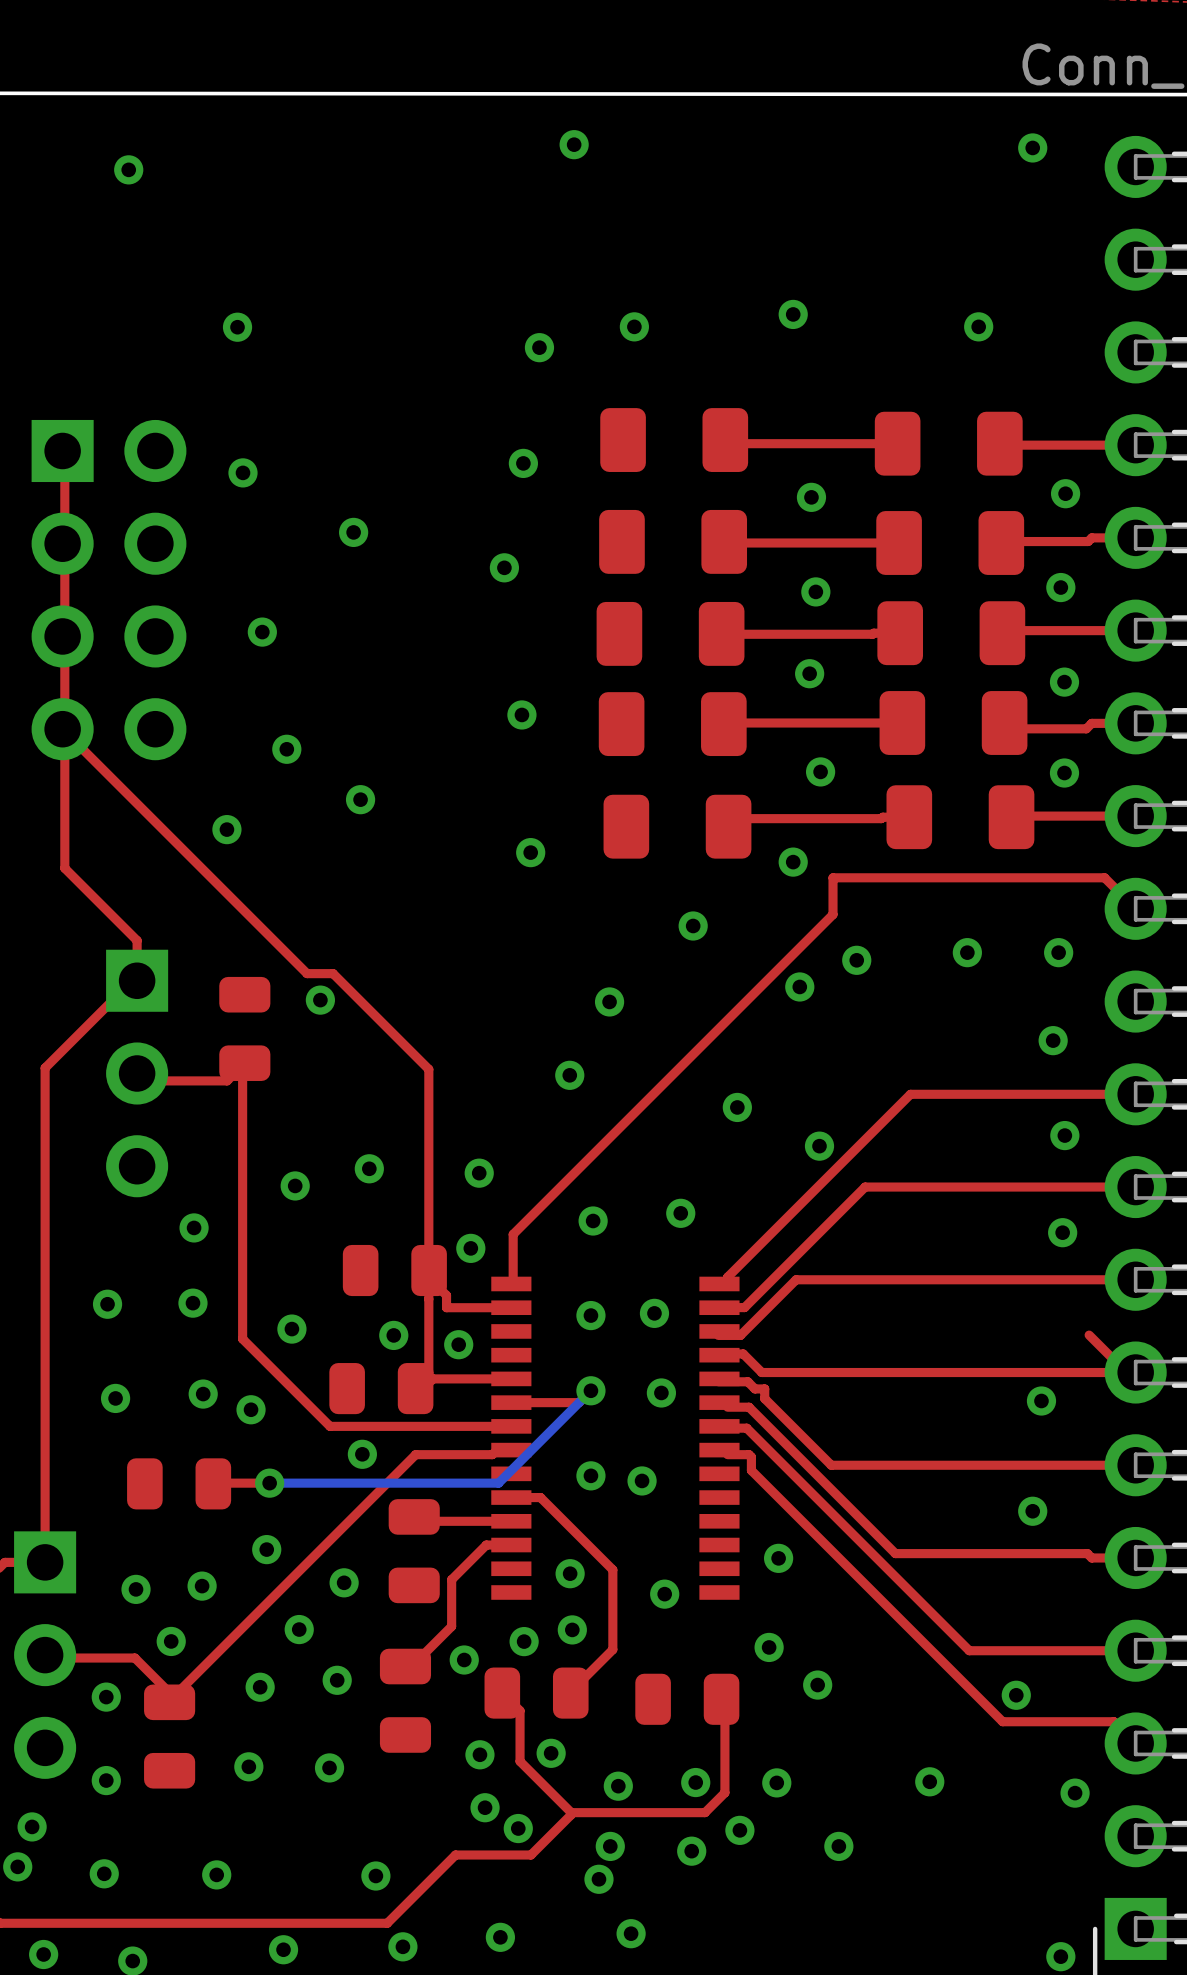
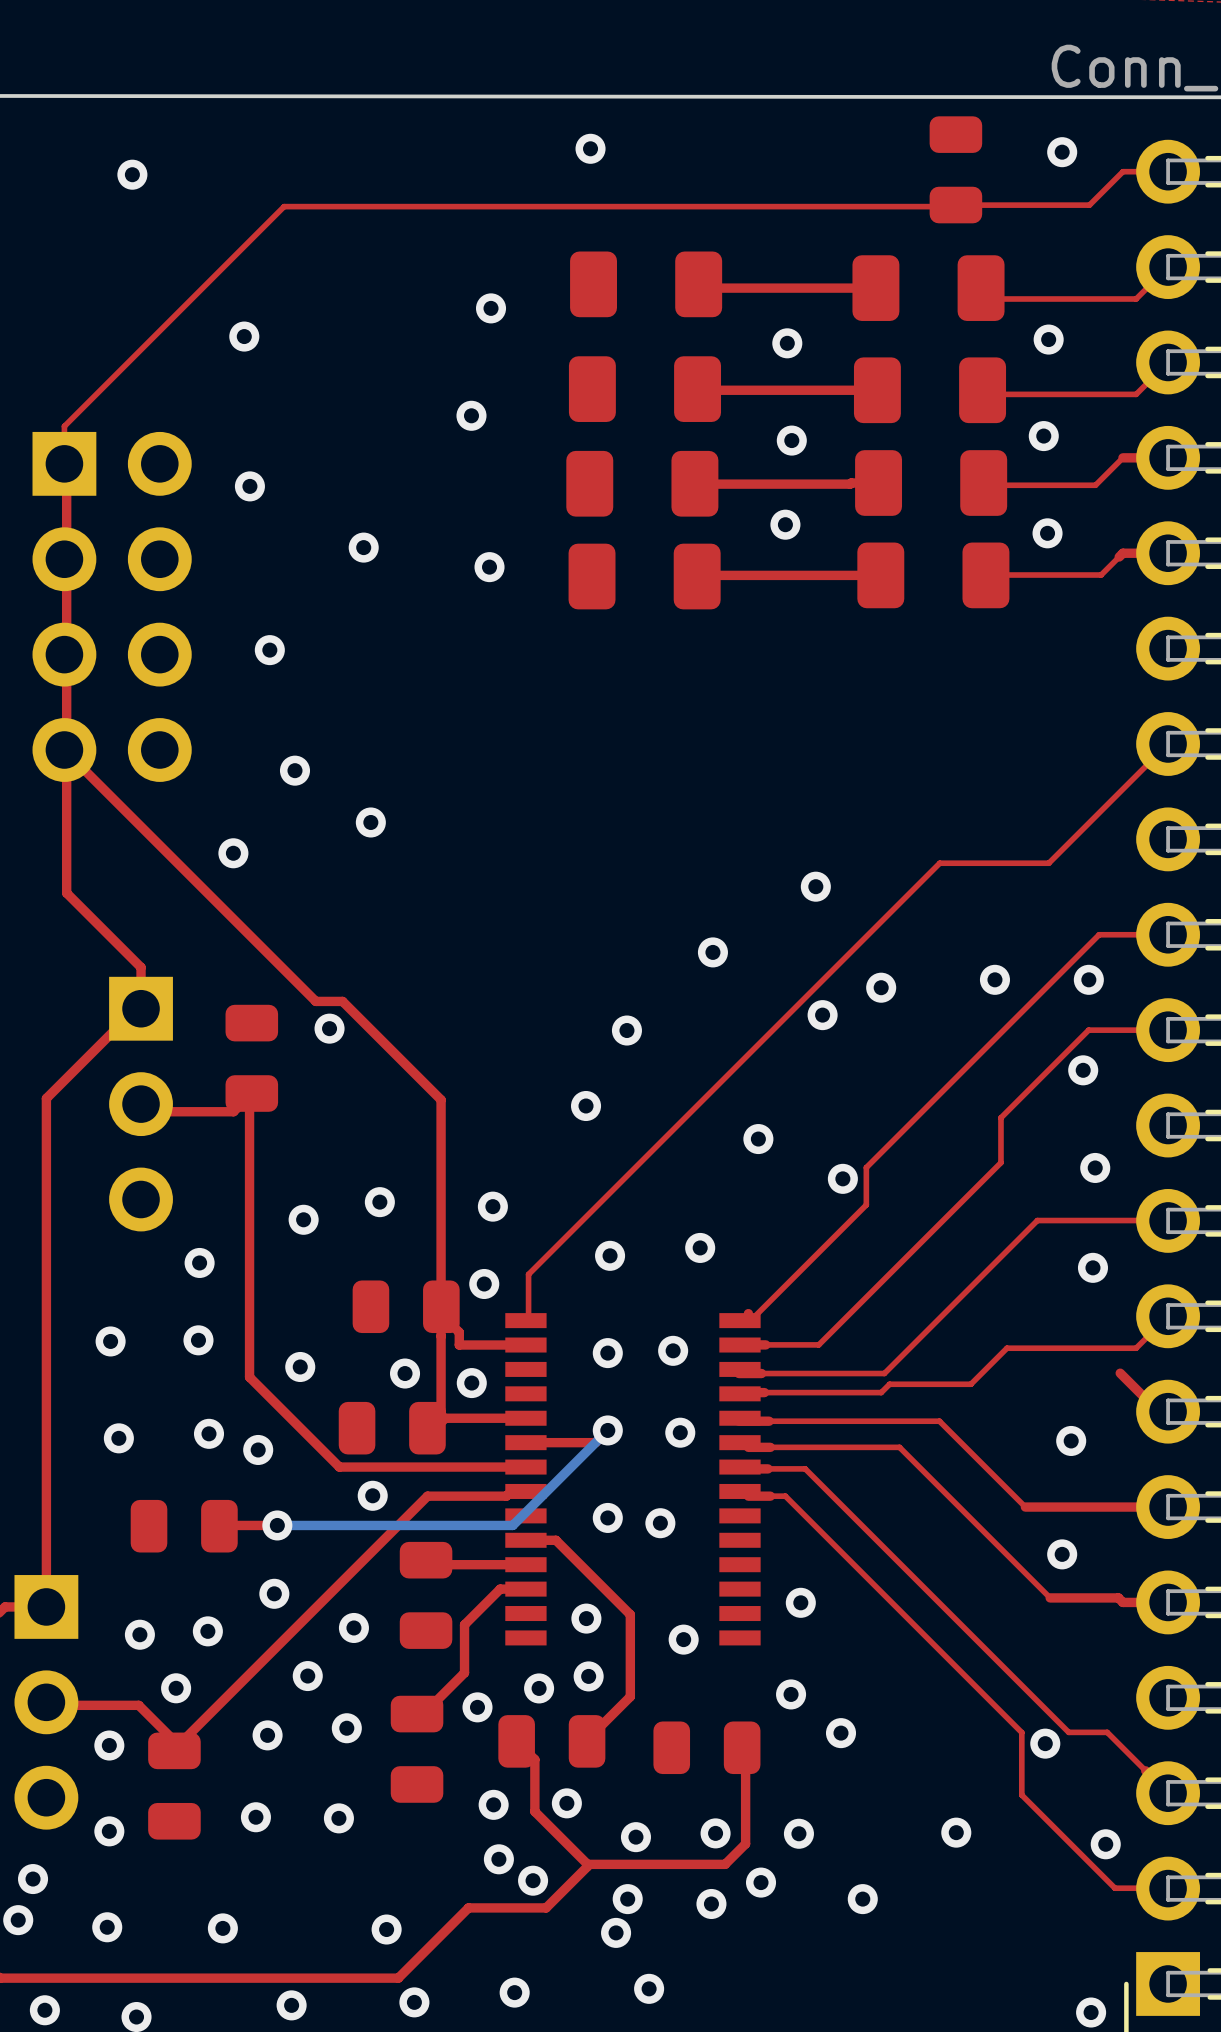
part: none -> (955, 169)
top track: none -> (1168, 171) (1122, 171) (1089, 205) (969, 205)
top track: none -> (958, 206) (284, 206) (64, 426) (64, 463)
top track: none -> (1168, 267) (1136, 299) (982, 299) (979, 295) (977, 296)
part: none -> (646, 284)
part: none -> (928, 288)
via: none -> (491, 308)
via position: (793, 314) -> (787, 343)
via: (634, 326) -> none
via position: (978, 326) -> (1048, 339)
via: (539, 347) -> none
top track: none -> (1168, 362) (1136, 394) (988, 394) (985, 392)
part: none -> (644, 389)
part: none -> (930, 390)
via: none -> (471, 415)
via: none -> (1043, 436)
via: none -> (791, 440)
top track: (727, 437) (733, 443) (897, 443) -> (701, 282) (707, 288) (875, 288)
part: (674, 440) -> none
part: (948, 443) -> none
top track: (1091, 445) (1002, 445) -> (1122, 457) (1095, 485) (984, 485)
via: (523, 463) -> none
part: none -> (931, 483)
part: none -> (642, 483)
via: (1065, 493) -> none
via: (811, 497) -> none
via: none -> (785, 524)
via: none -> (1047, 533)
part: (673, 541) -> none
top track: (1088, 541) (1001, 541) (999, 543) -> (1119, 556) (1101, 575) (990, 575)
top track: (899, 543) (730, 543) (724, 548) -> (877, 390) (704, 390) (698, 396)
part: (950, 543) -> none
part: none -> (933, 575)
part: none -> (644, 576)
via position: (504, 567) -> (489, 567)
via: (1060, 587) -> none
via: (815, 591) -> none
top track: (1008, 629) (1135, 630) -> none
part: (670, 633) -> none
top track: (900, 633) (726, 634) -> (878, 483) (700, 484)
part: (951, 633) -> none
via: (809, 673) -> none
via: (1064, 682) -> none
via: (521, 714) -> none
top track: (726, 718) (730, 722) (902, 722) -> (699, 570) (703, 575) (880, 575)
part: (953, 722) -> none
top track: (1135, 723) (1091, 723) (1086, 728) (1003, 728) -> (1168, 743) (1048, 863) (939, 863) (528, 1274) (528, 1320)
part: (672, 724) -> none
via: (820, 771) -> none
via: (1064, 773) -> none
top track: (1013, 811) (1018, 816) (1135, 816) -> none
top track: (909, 817) (734, 818) -> none
part: (960, 817) -> none
part: (677, 826) -> none
via: (530, 852) -> none
top track: (1135, 908) (1104, 877) (833, 877) (833, 914) (513, 1234) (513, 1282) -> (1168, 934) (1099, 934) (866, 1167) (866, 1204) (752, 1319)
top track: (1135, 1094) (910, 1094) (727, 1277) -> none
top track: none -> (1165, 1220) (1037, 1220) (884, 1373) (761, 1373)
top track: (1135, 1187) (865, 1187) (744, 1307) -> (1168, 1030) (1088, 1030) (1000, 1117) (1000, 1162) (818, 1344) (765, 1344)
top track: (1135, 1279) (796, 1279) (740, 1335) -> (1168, 1316) (1136, 1348) (1006, 1348) (970, 1384) (889, 1384) (881, 1392) (764, 1392)
top track: (743, 1353) (761, 1372) (1135, 1372) -> none
top track: (747, 1381) (755, 1388) (764, 1388) (764, 1398) (831, 1465) (996, 1465) -> (769, 1421) (939, 1421) (1025, 1507)
top track: (749, 1407) (895, 1553) (1021, 1553) -> (770, 1447) (899, 1447) (1050, 1597)
top track: (746, 1428) (969, 1650) (1135, 1650) -> (768, 1468) (805, 1468) (1068, 1732) (1107, 1732) (1168, 1793)
top track: (749, 1454) (751, 1457) (751, 1470) (1002, 1721) (1113, 1721) -> (770, 1496) (785, 1496) (1021, 1732) (1021, 1795) (1114, 1888) (1165, 1888)

